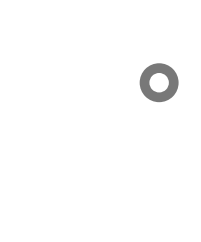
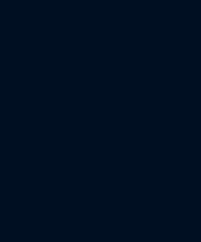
via: (159, 82) -> none

